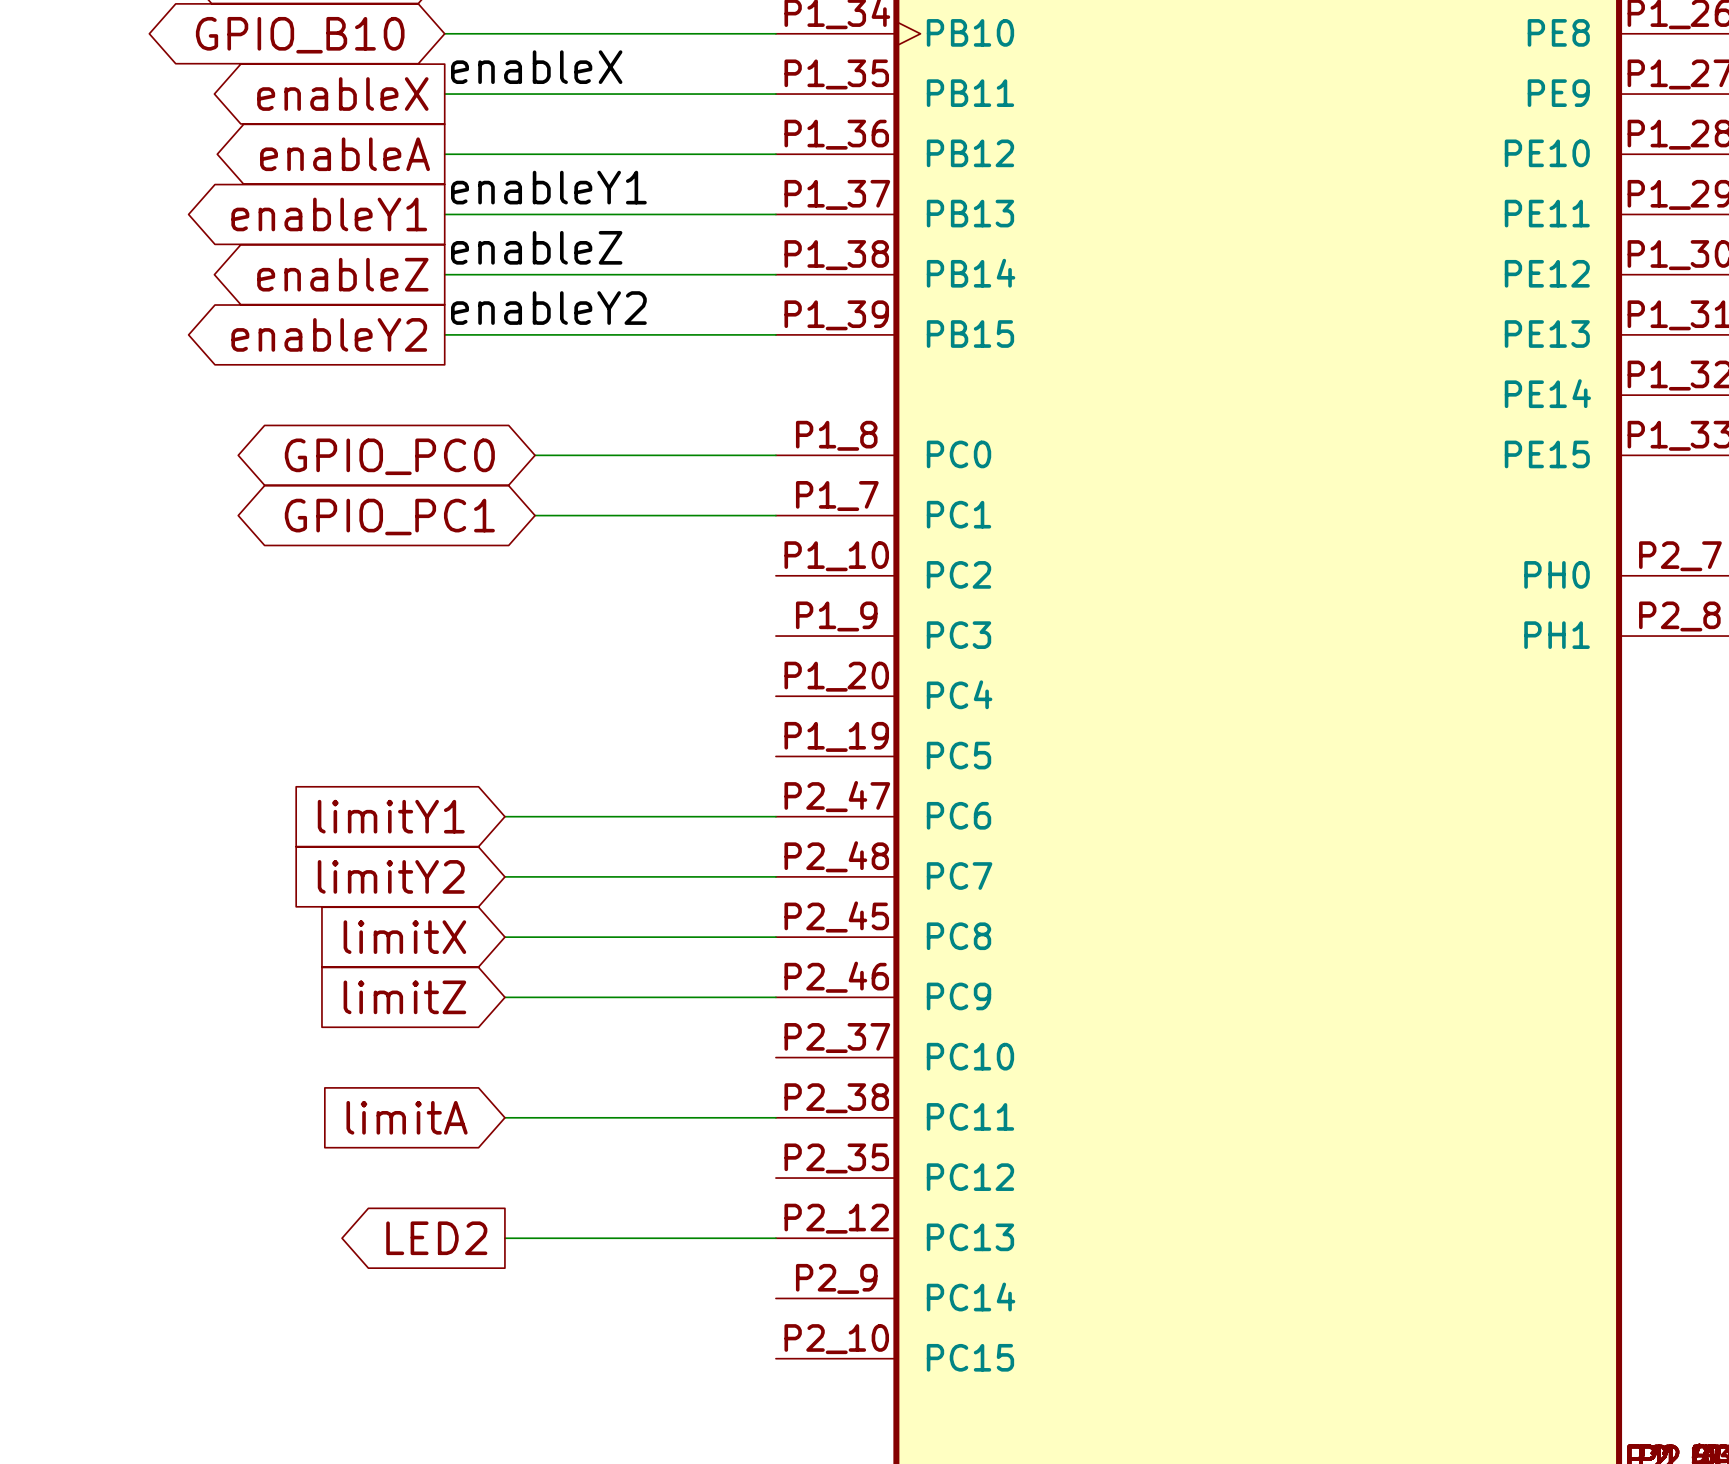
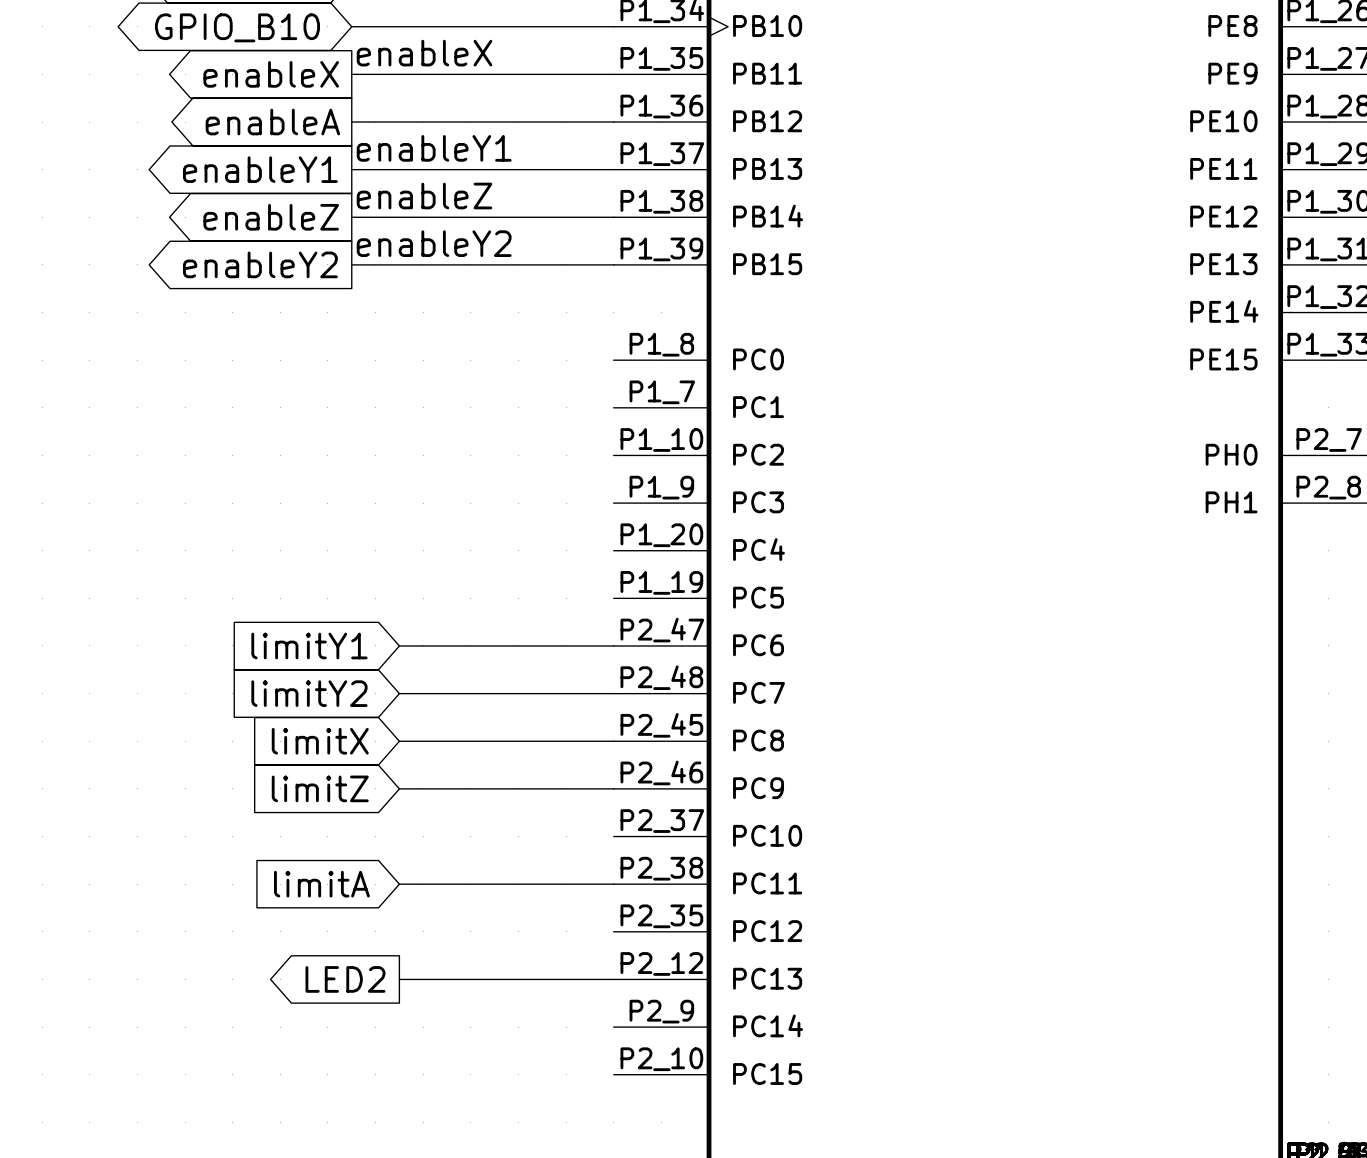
wire: (535, 455) (775, 455) -> none
global label: GPIO_PC0 (389, 456) -> none
wire: (535, 515) (775, 515) -> none
global label: GPIO_PC1 (389, 517) -> none

